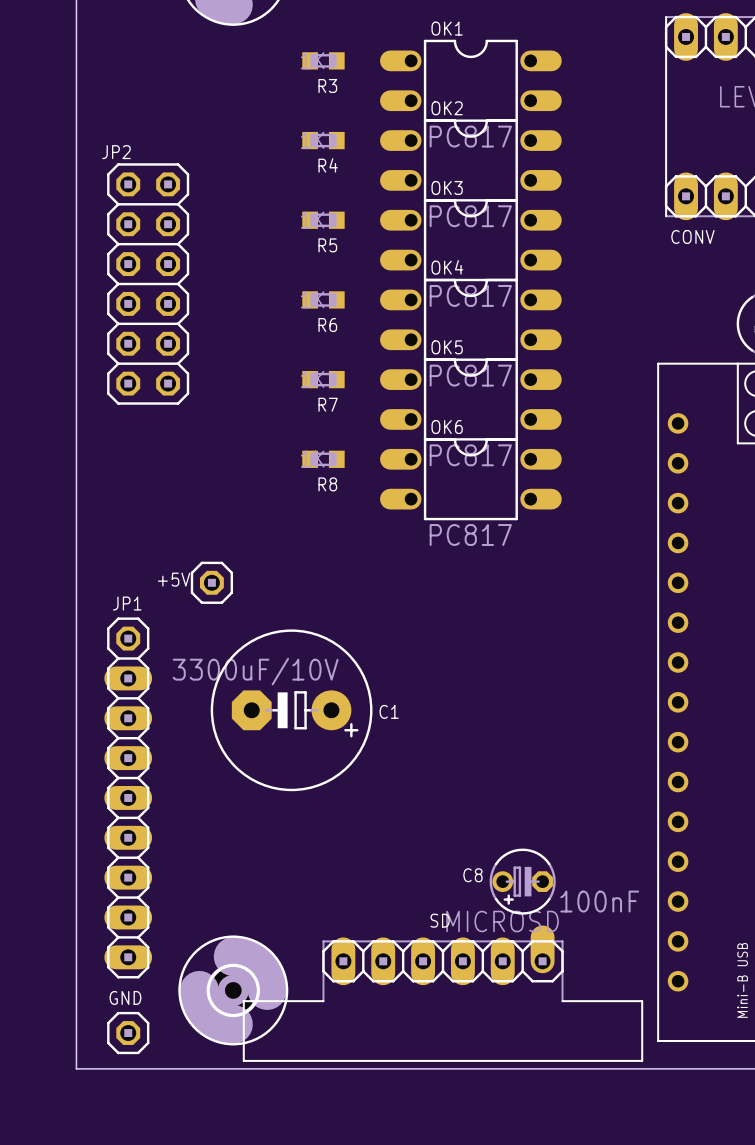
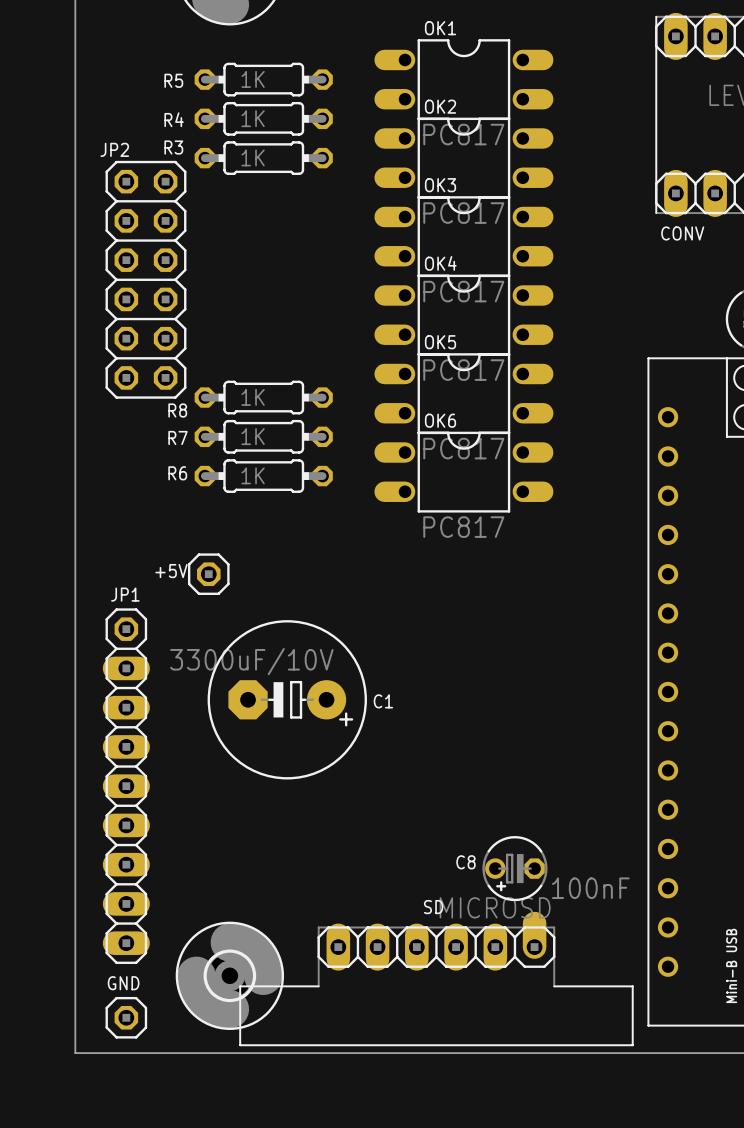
R3 footprint: [302, 52, 345, 70] -> [194, 141, 333, 175]
R3 name position: R3 (327, 85) -> R3 (173, 147)
R4 footprint: [302, 131, 345, 150] -> [194, 101, 333, 136]
R4 name position: R4 (328, 165) -> R4 (174, 119)
R5 footprint: [302, 211, 345, 229] -> [194, 62, 333, 97]
R5 name position: R5 (327, 245) -> R5 (173, 80)
R6 footprint: [302, 291, 345, 309] -> [194, 459, 333, 493]
R6 name position: R6 (327, 325) -> R6 (177, 473)
R7 footprint: [302, 370, 345, 389] -> [194, 419, 333, 454]
R7 name position: R7 (328, 404) -> R7 (178, 437)
R8 footprint: [302, 450, 345, 468] -> [194, 380, 333, 415]
R8 name position: R8 (327, 484) -> R8 (177, 410)

